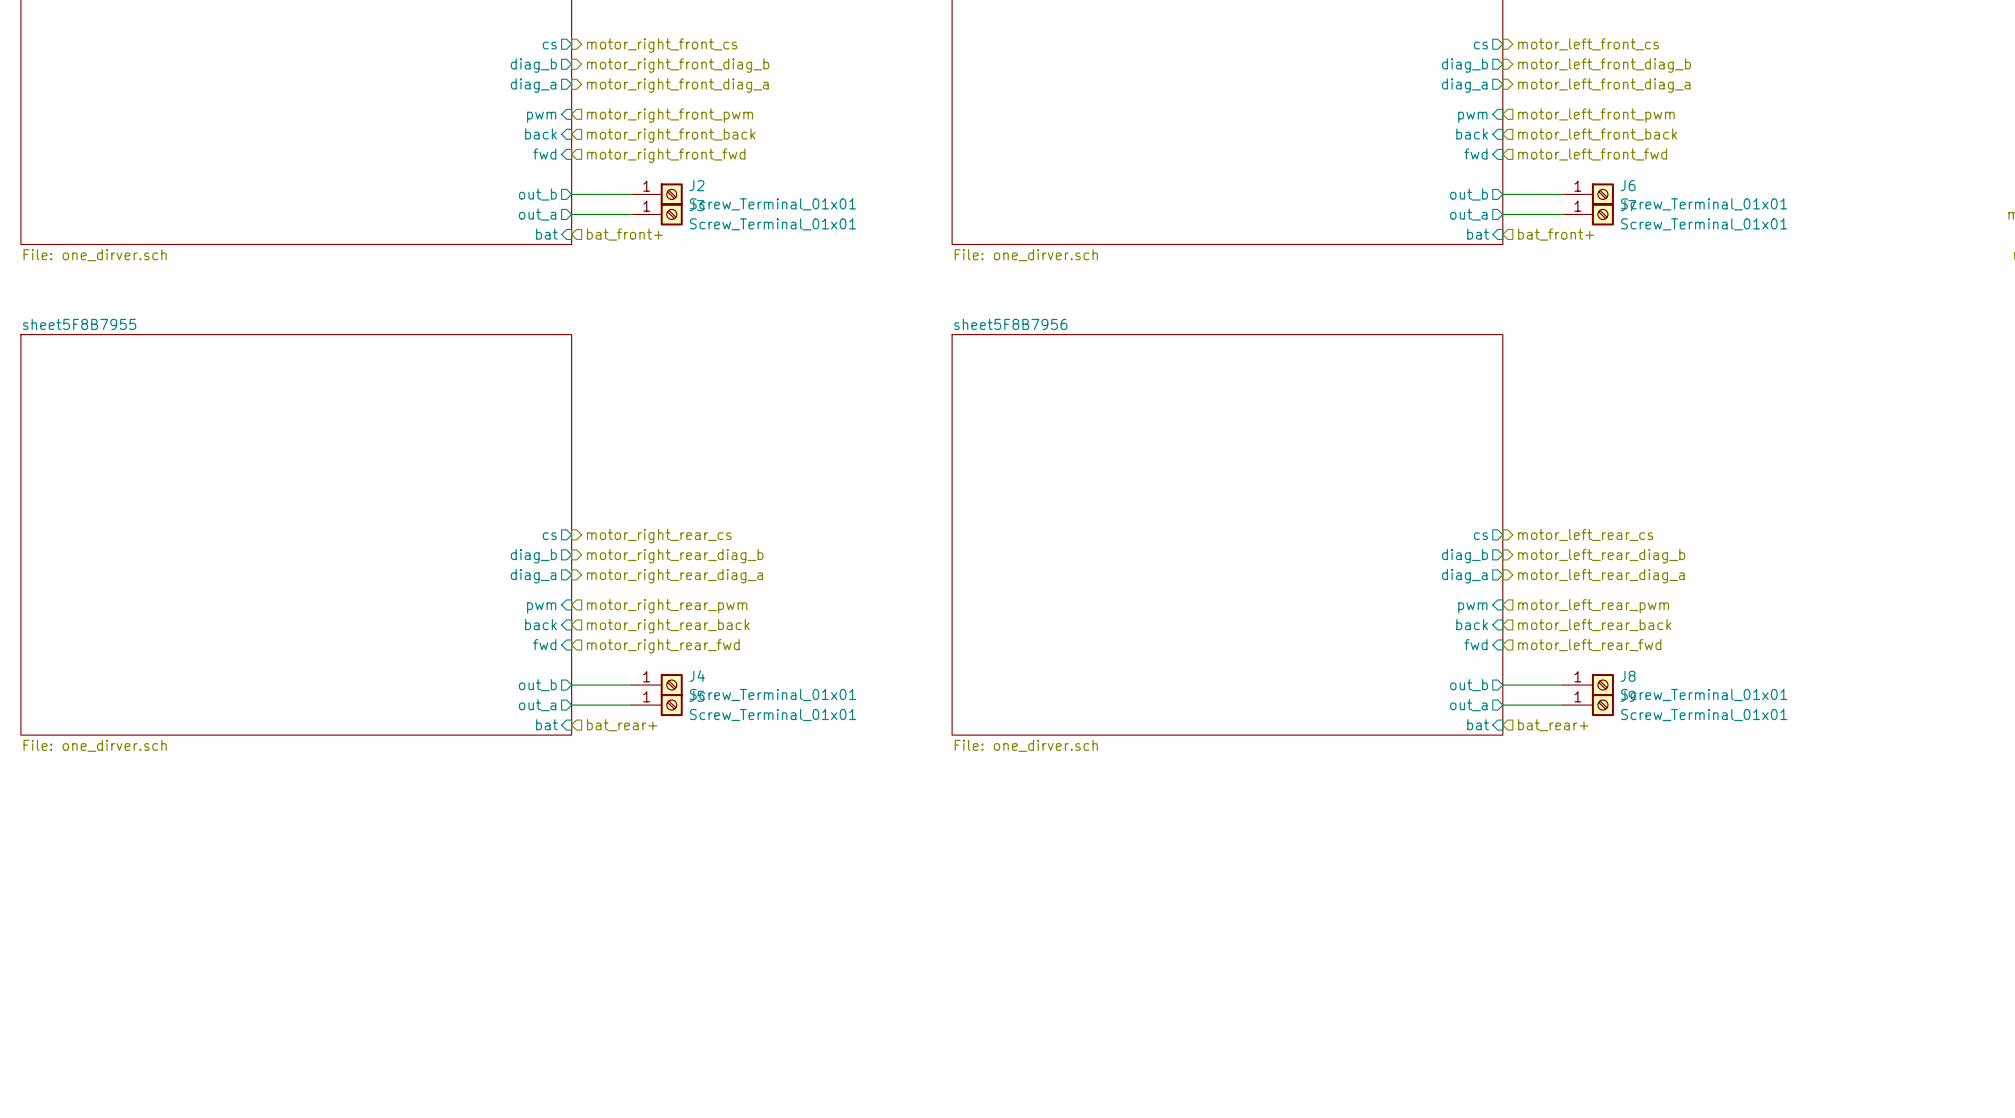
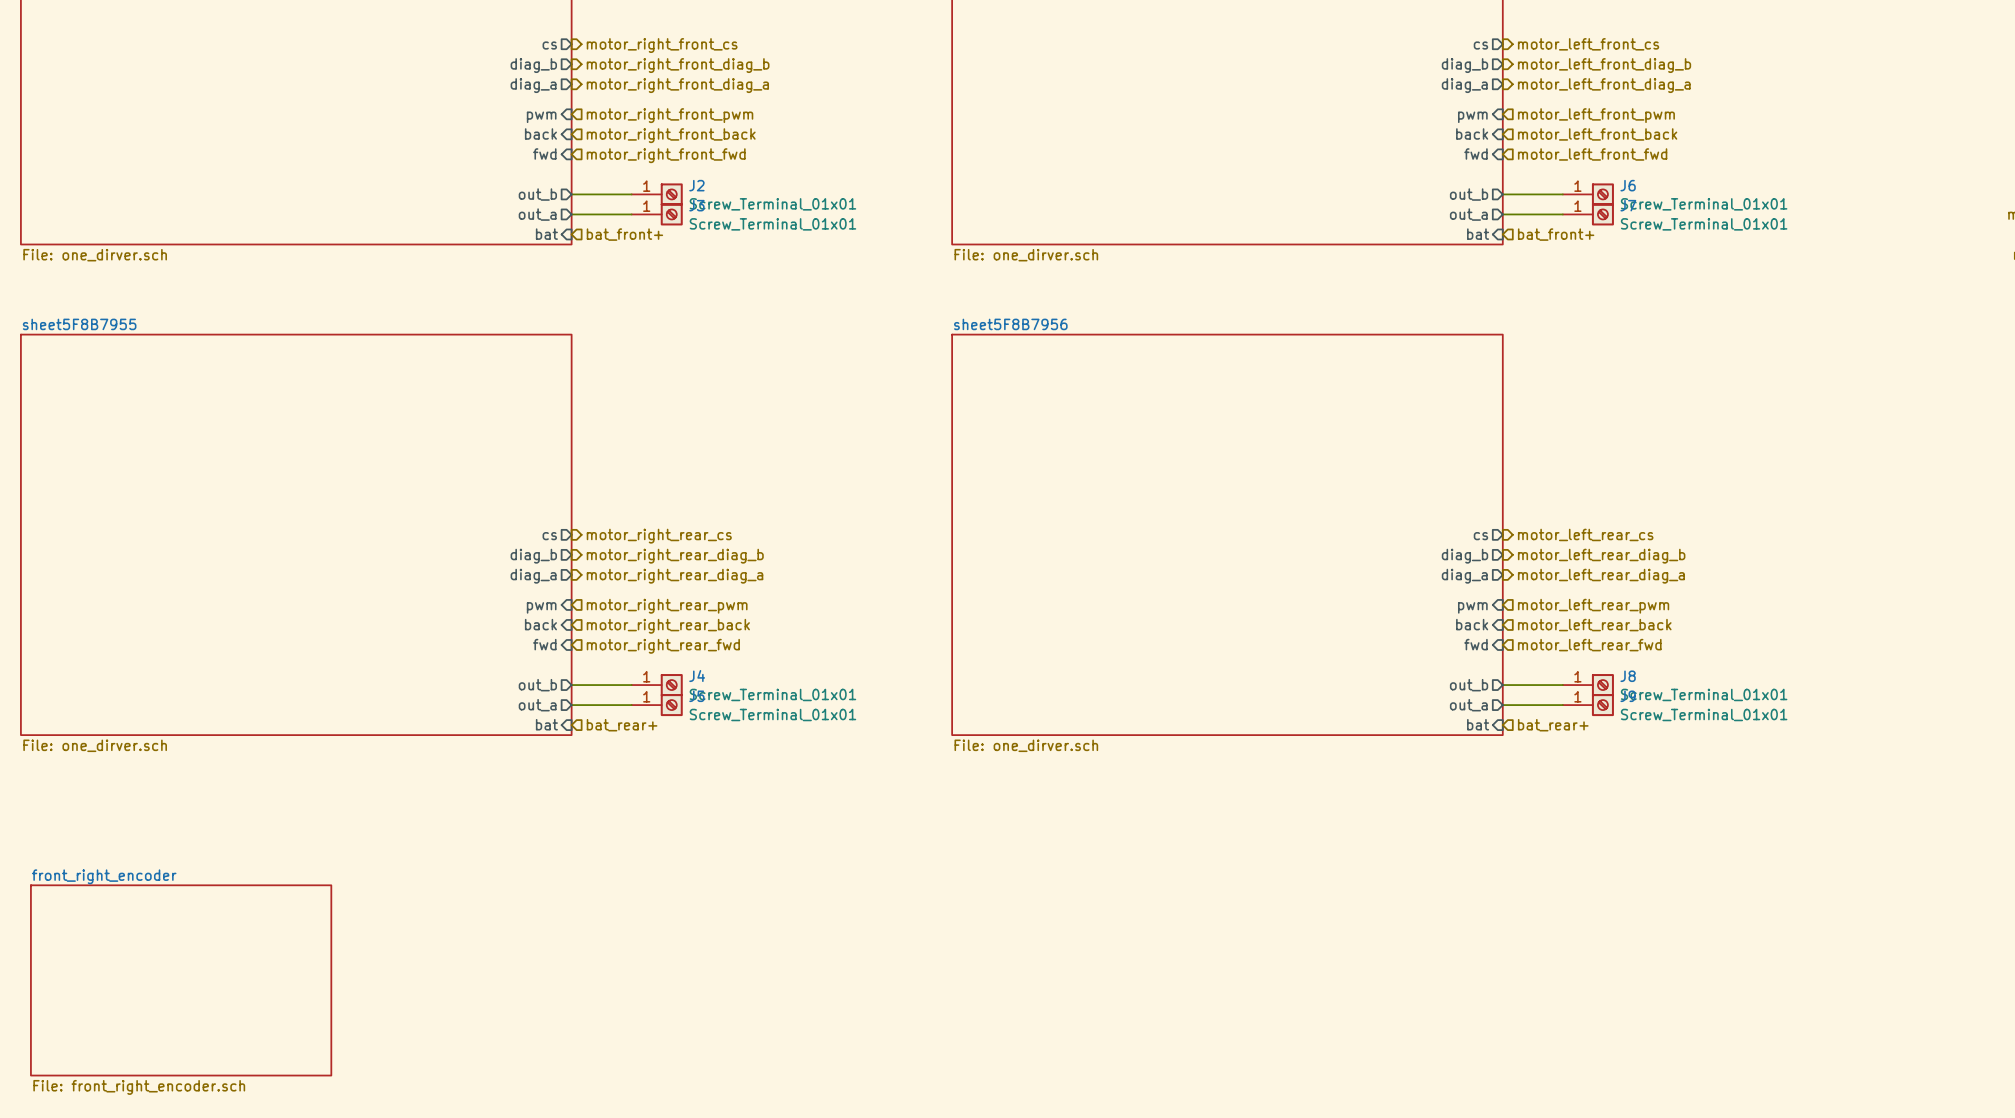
sheet front_right_encoder: none -> File: front_right_encoder.sch (181, 980)

